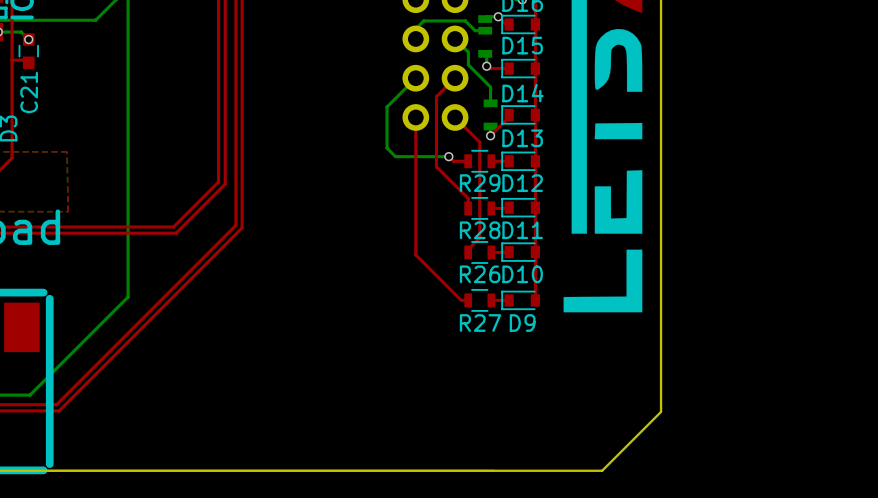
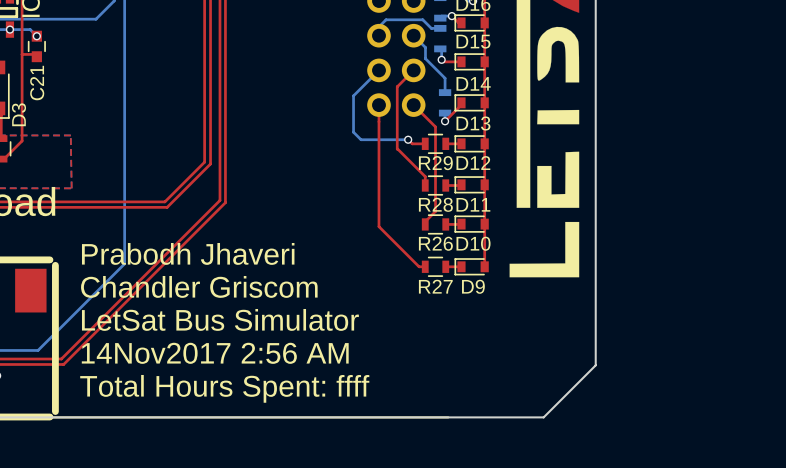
text: none -> Prabodh Jhaveri (188, 253)
text: none -> Chandler Griscom (199, 286)
text: none -> LetSat Bus Simulator (220, 319)
text: none -> 14Nov2017 2:56 AM (215, 353)
text: none -> Total Hours Spent: ffff (224, 388)

